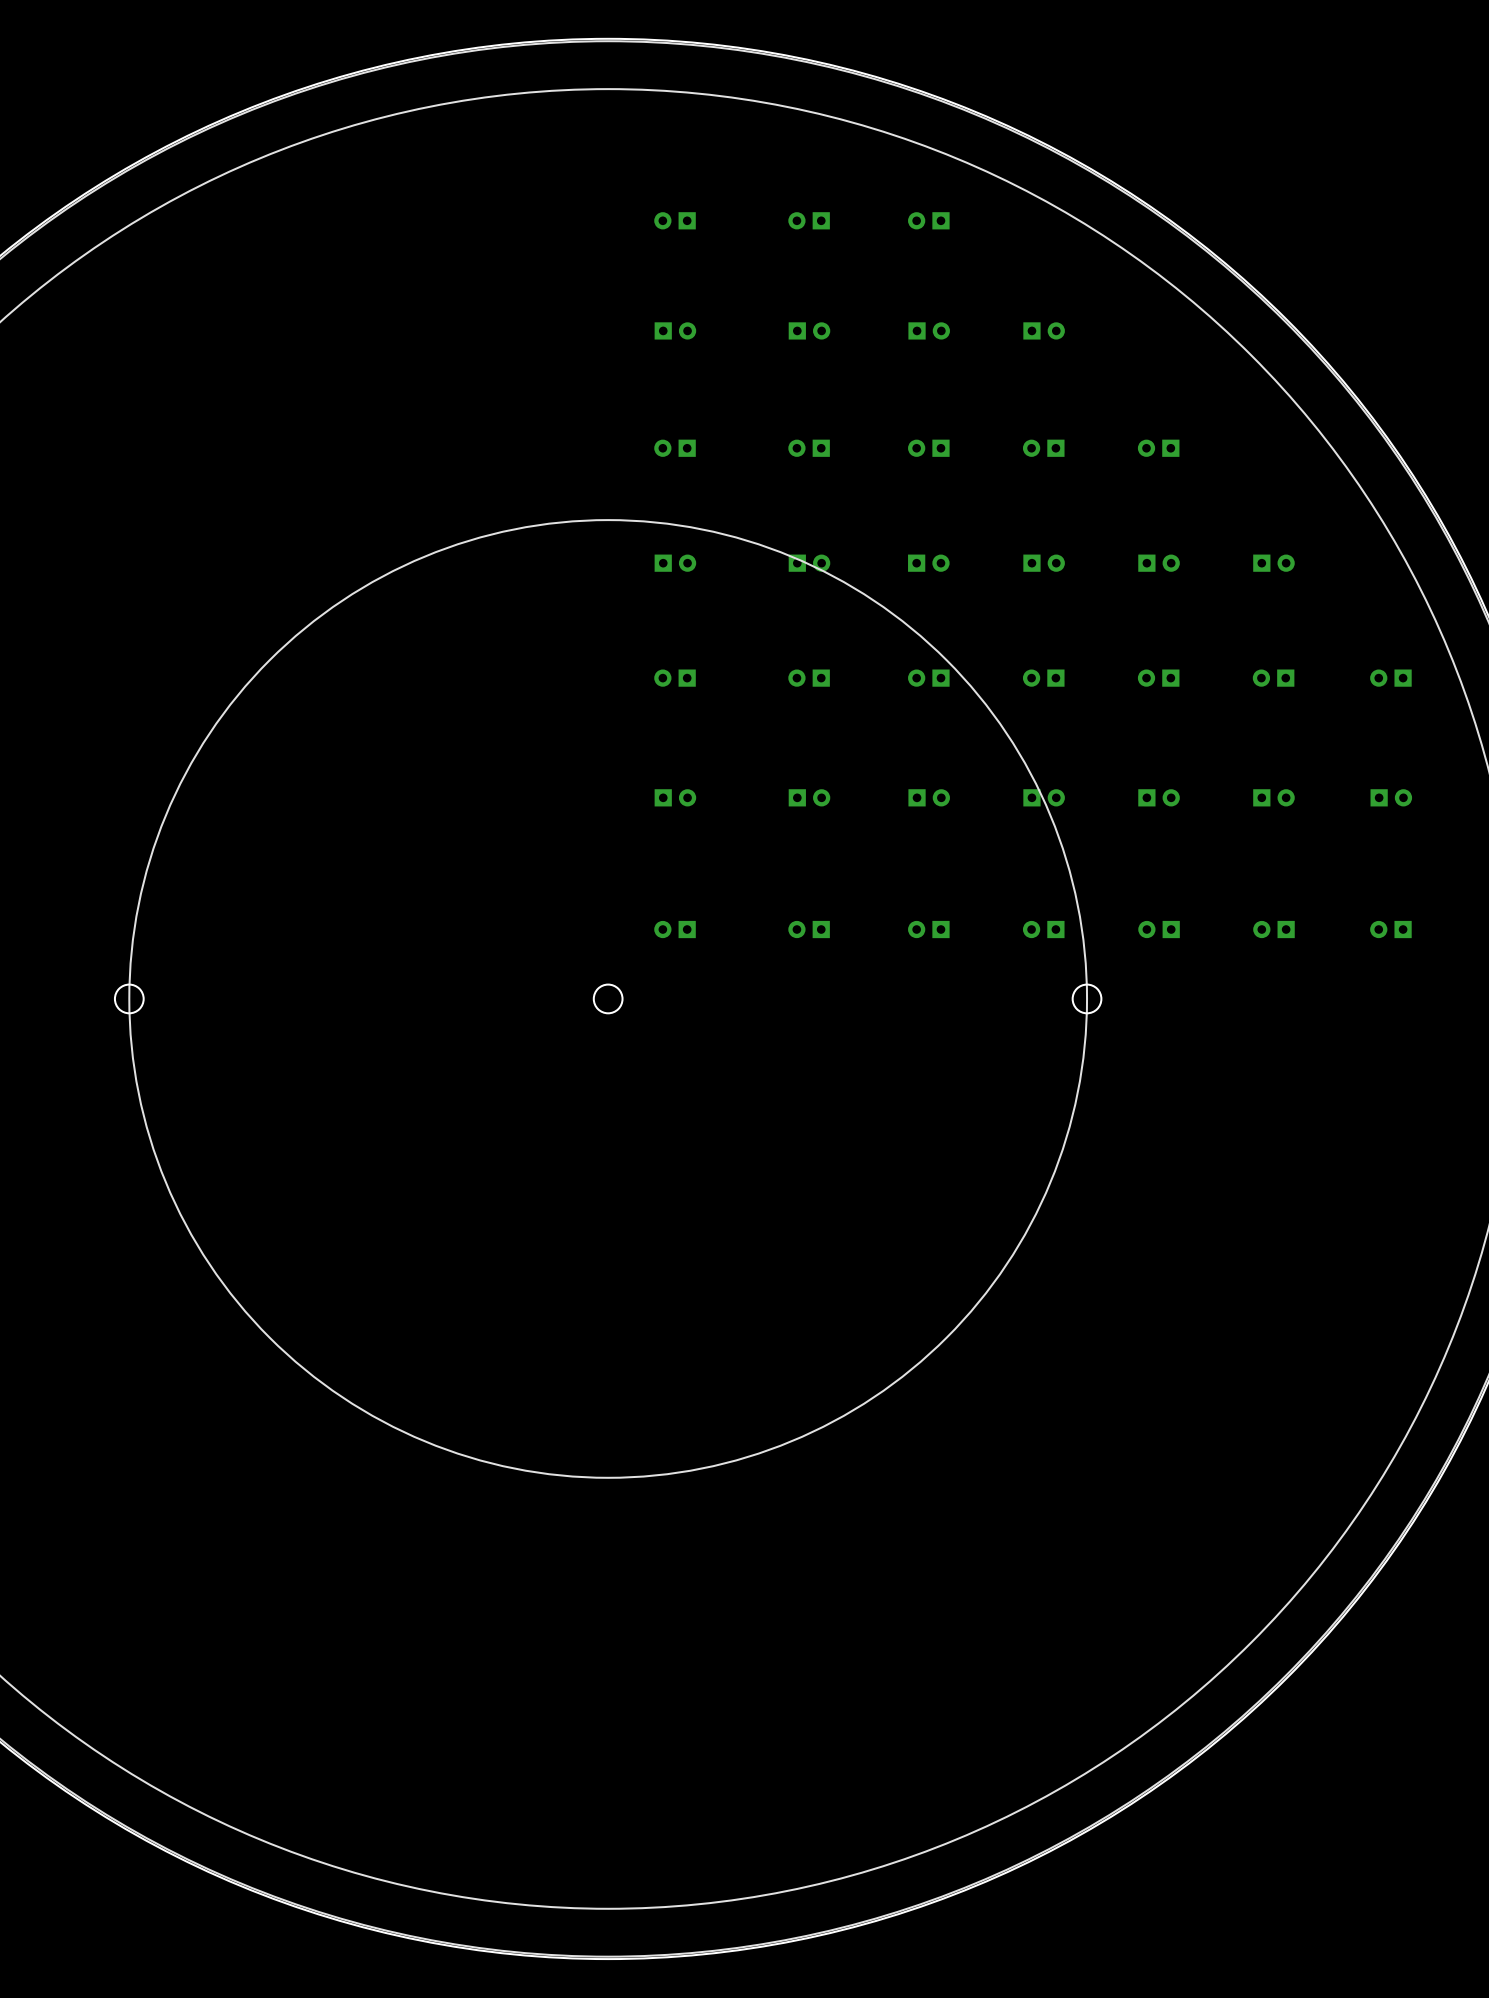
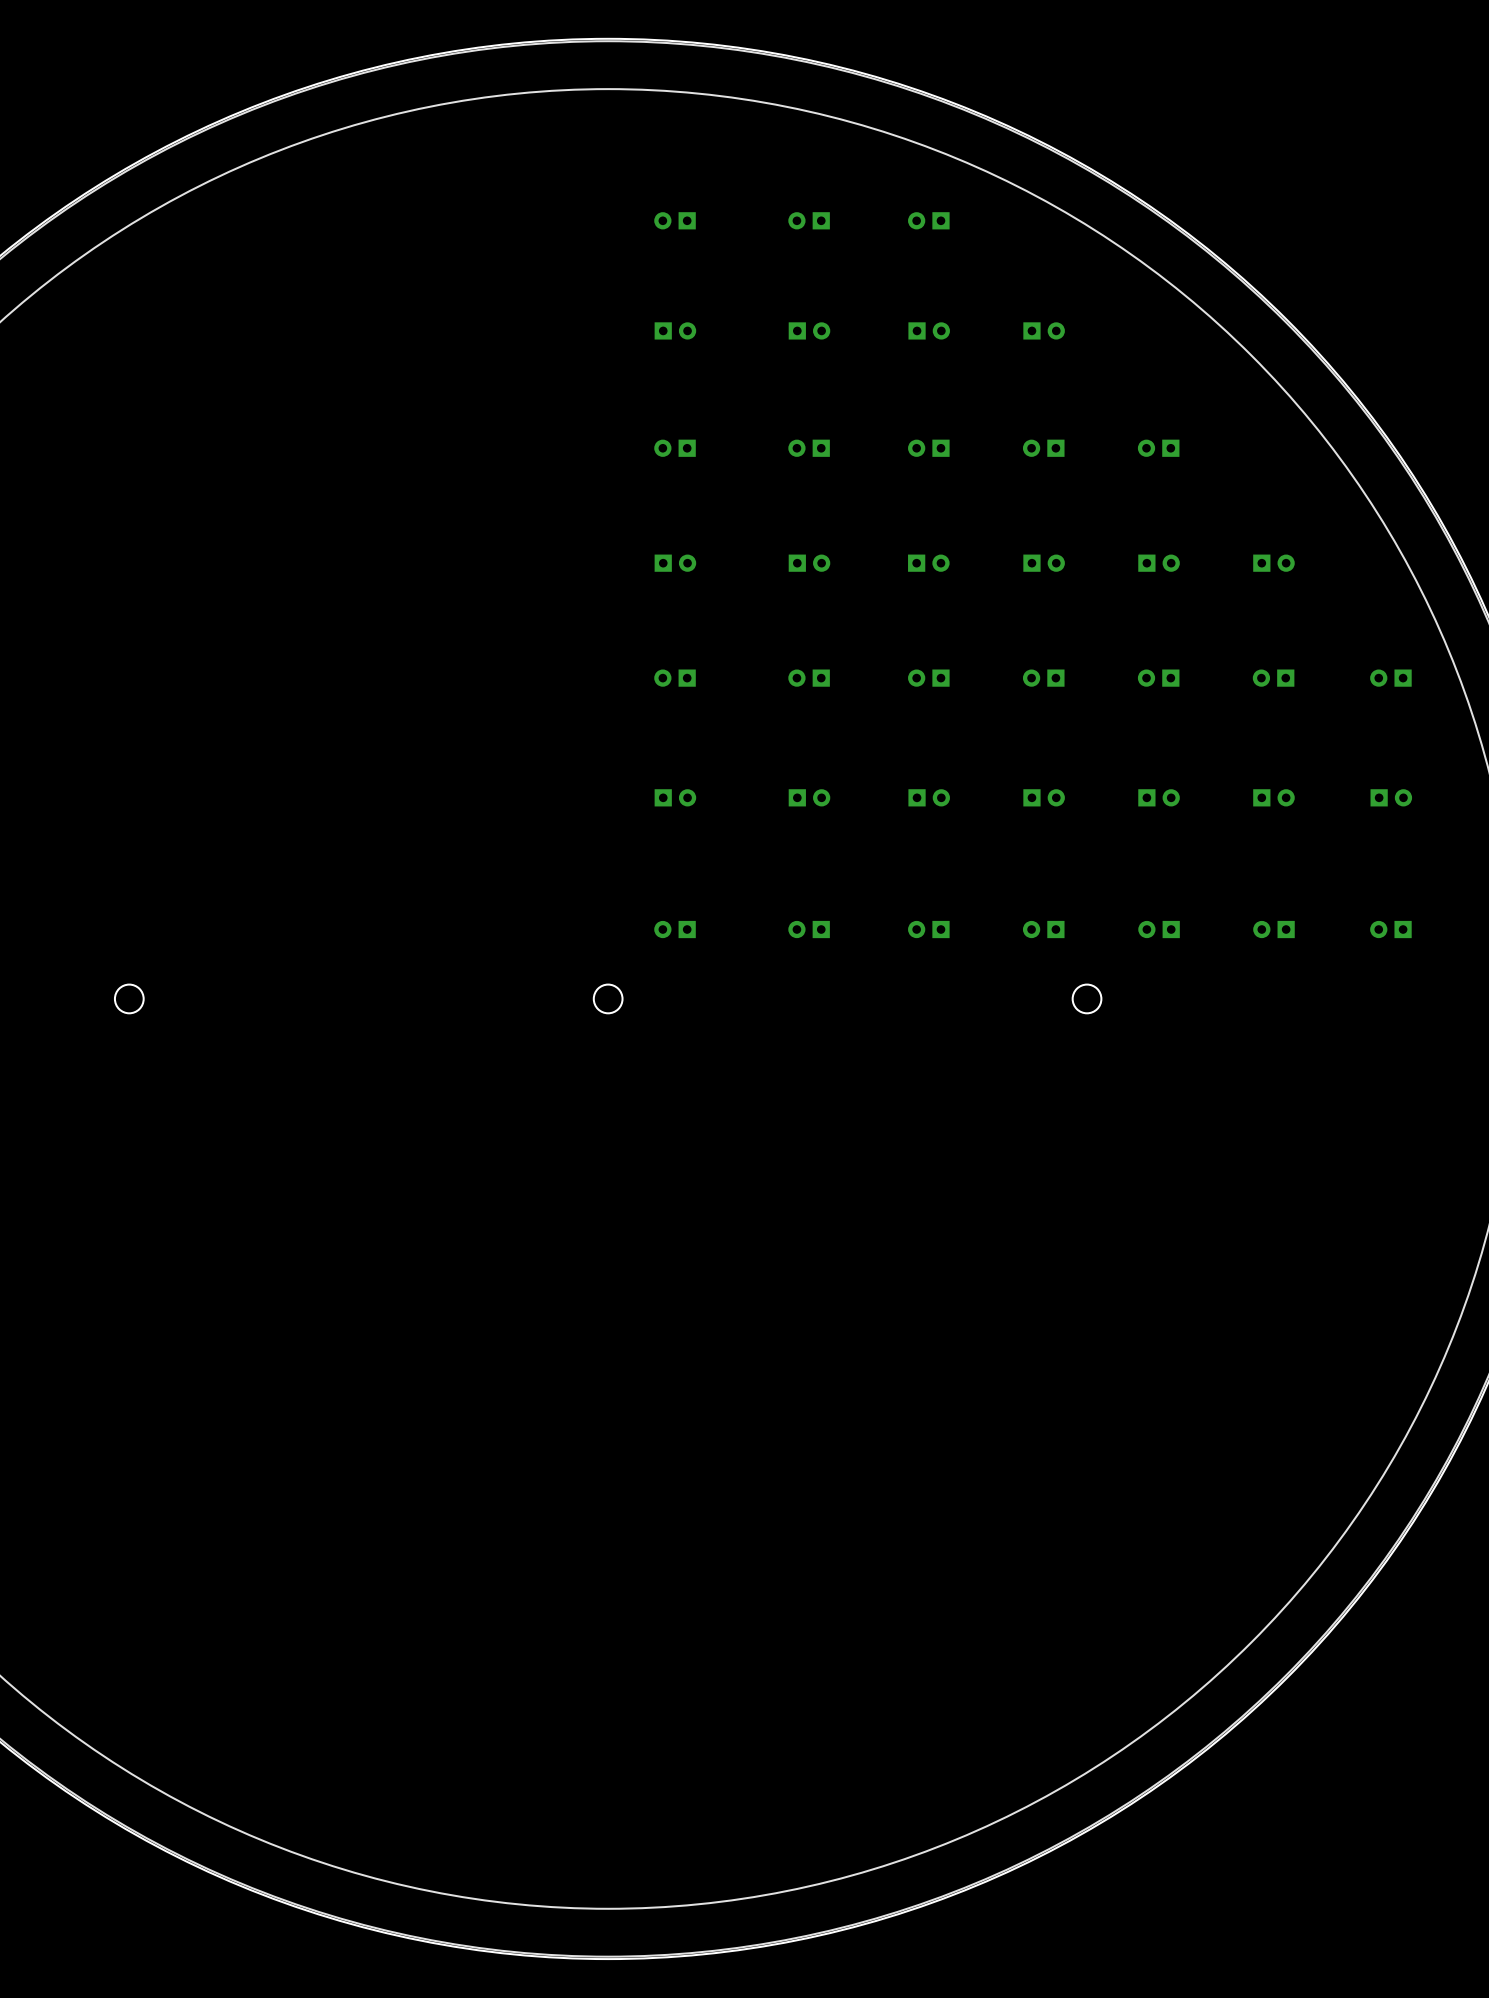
drawing: [128, 519, 1088, 1479] -> none

